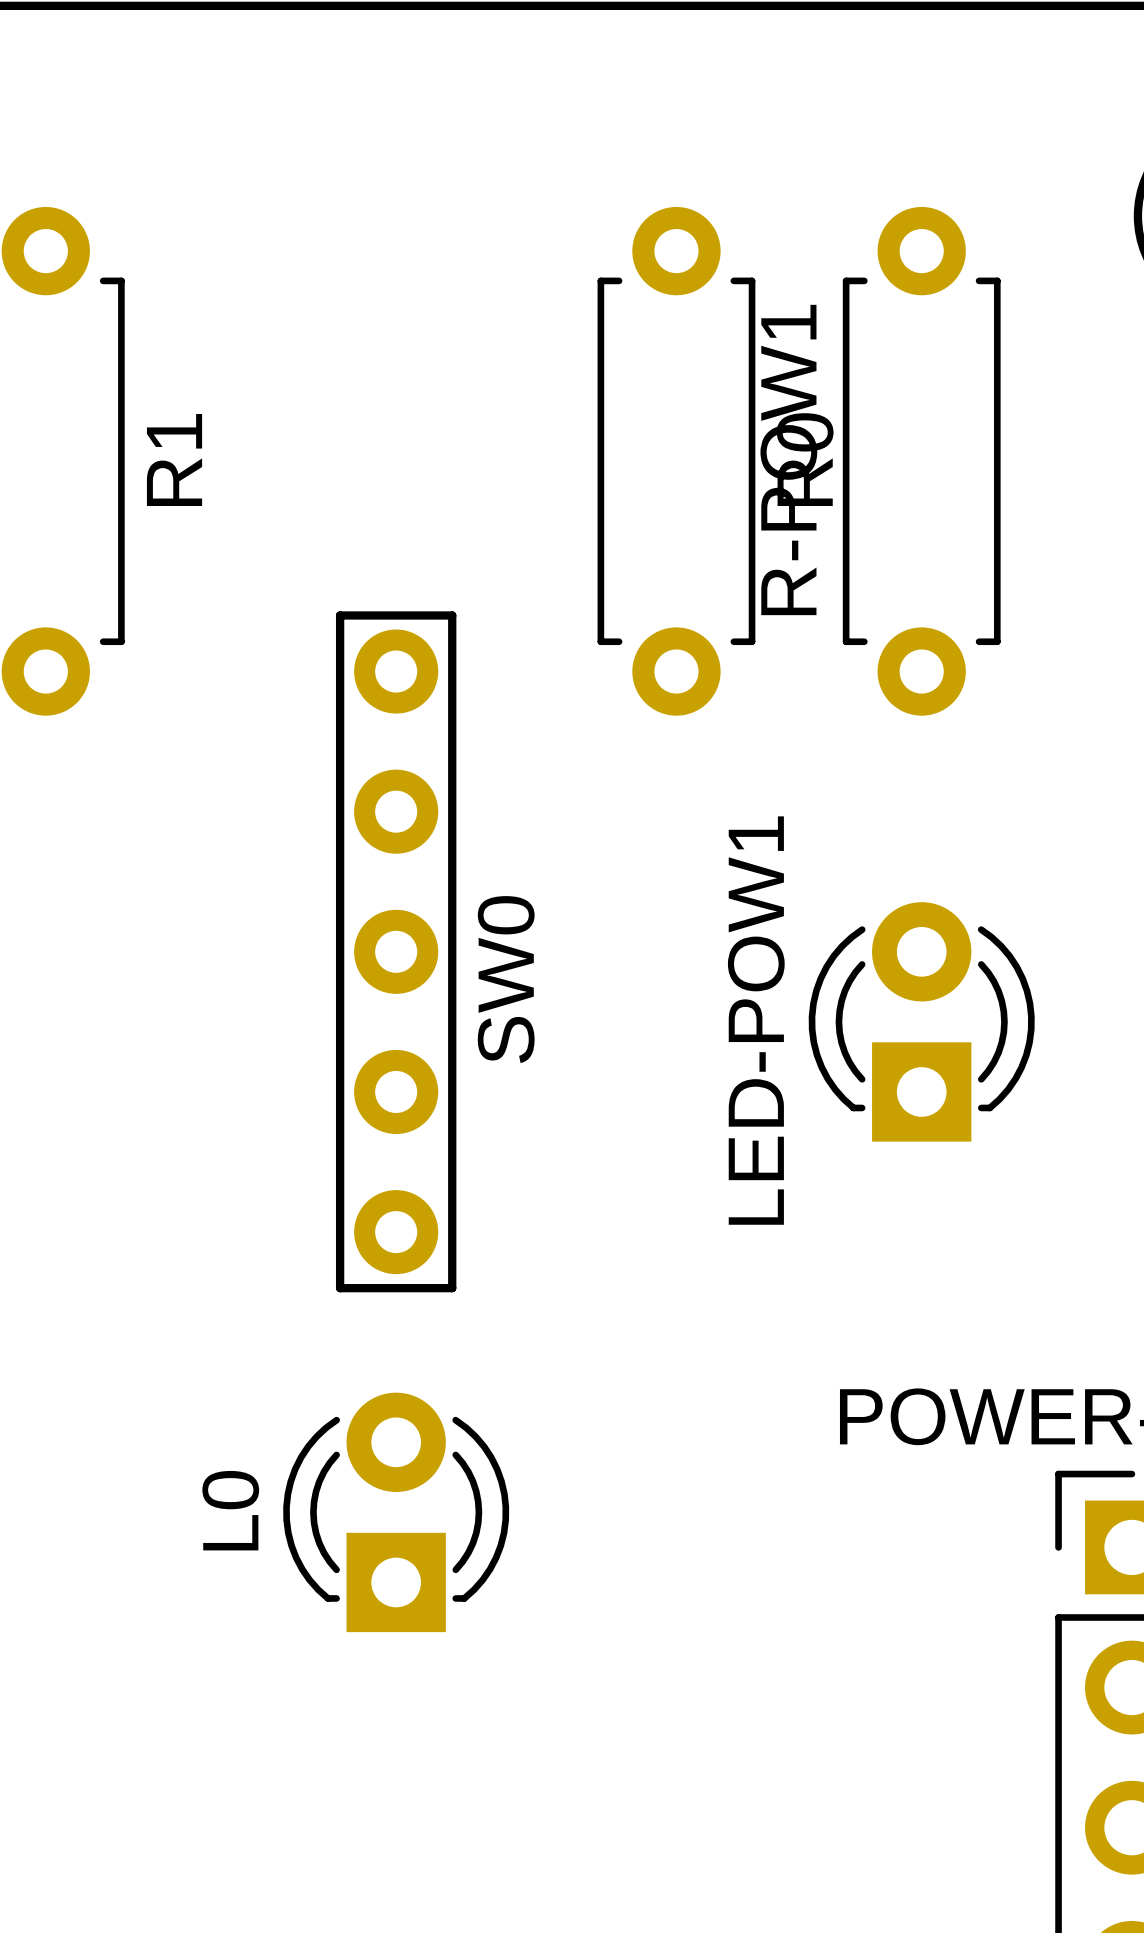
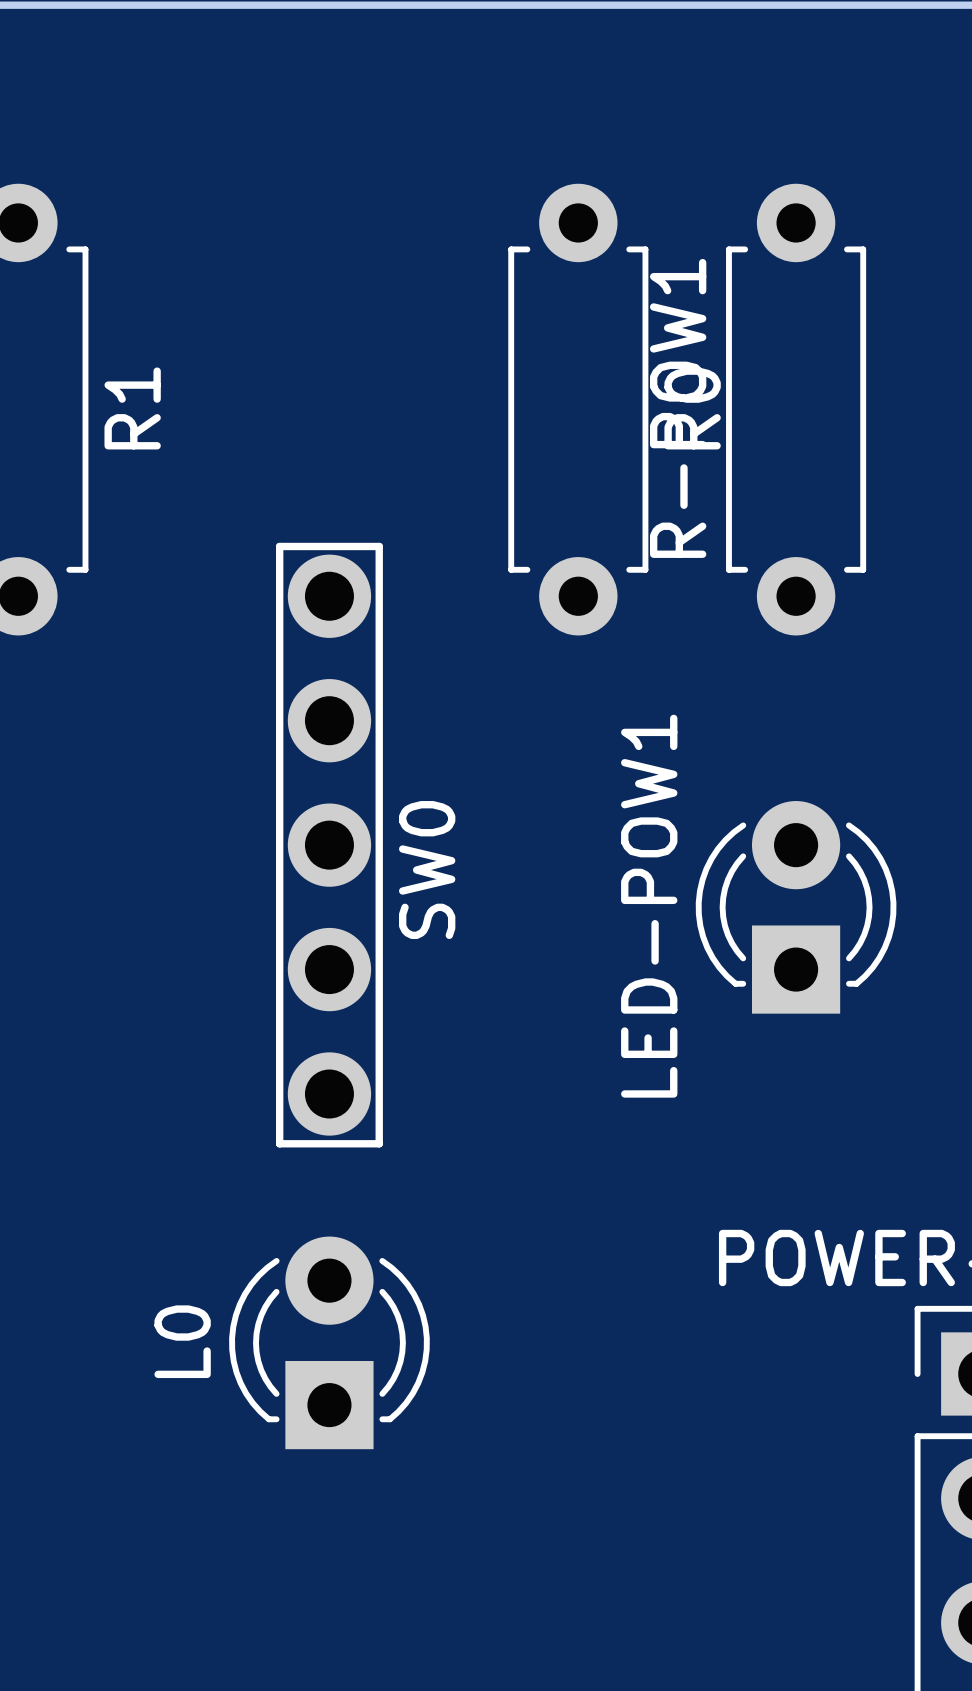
SW0 footprint: [335, 611, 457, 1293] -> [276, 542, 383, 1148]

